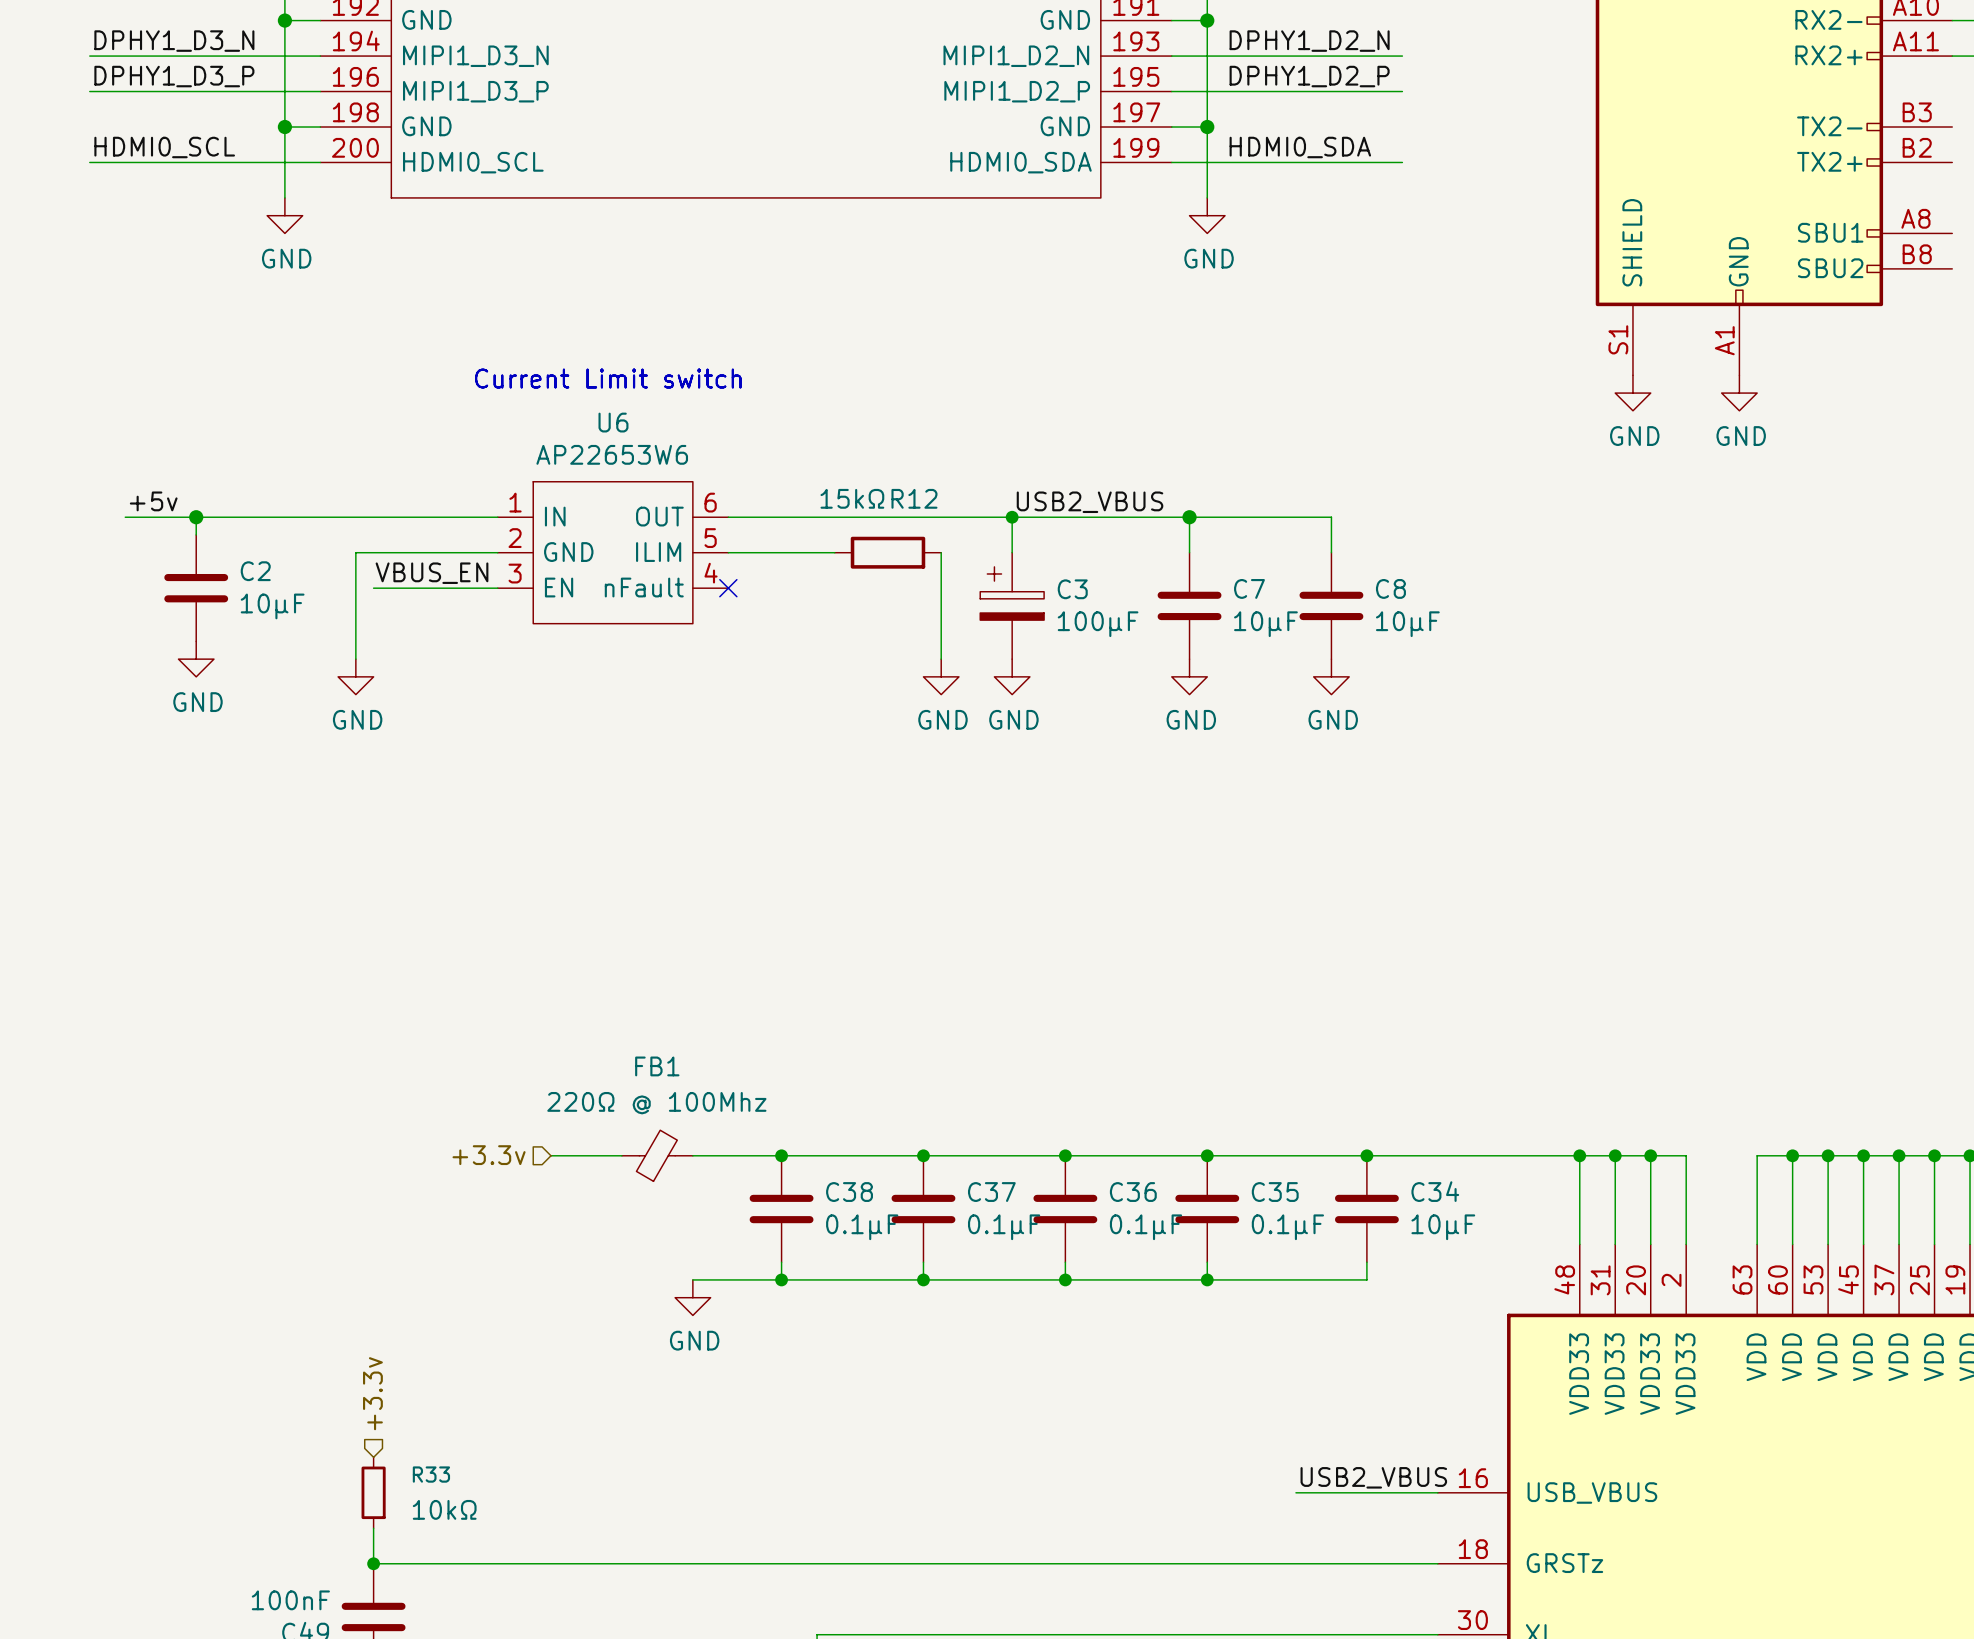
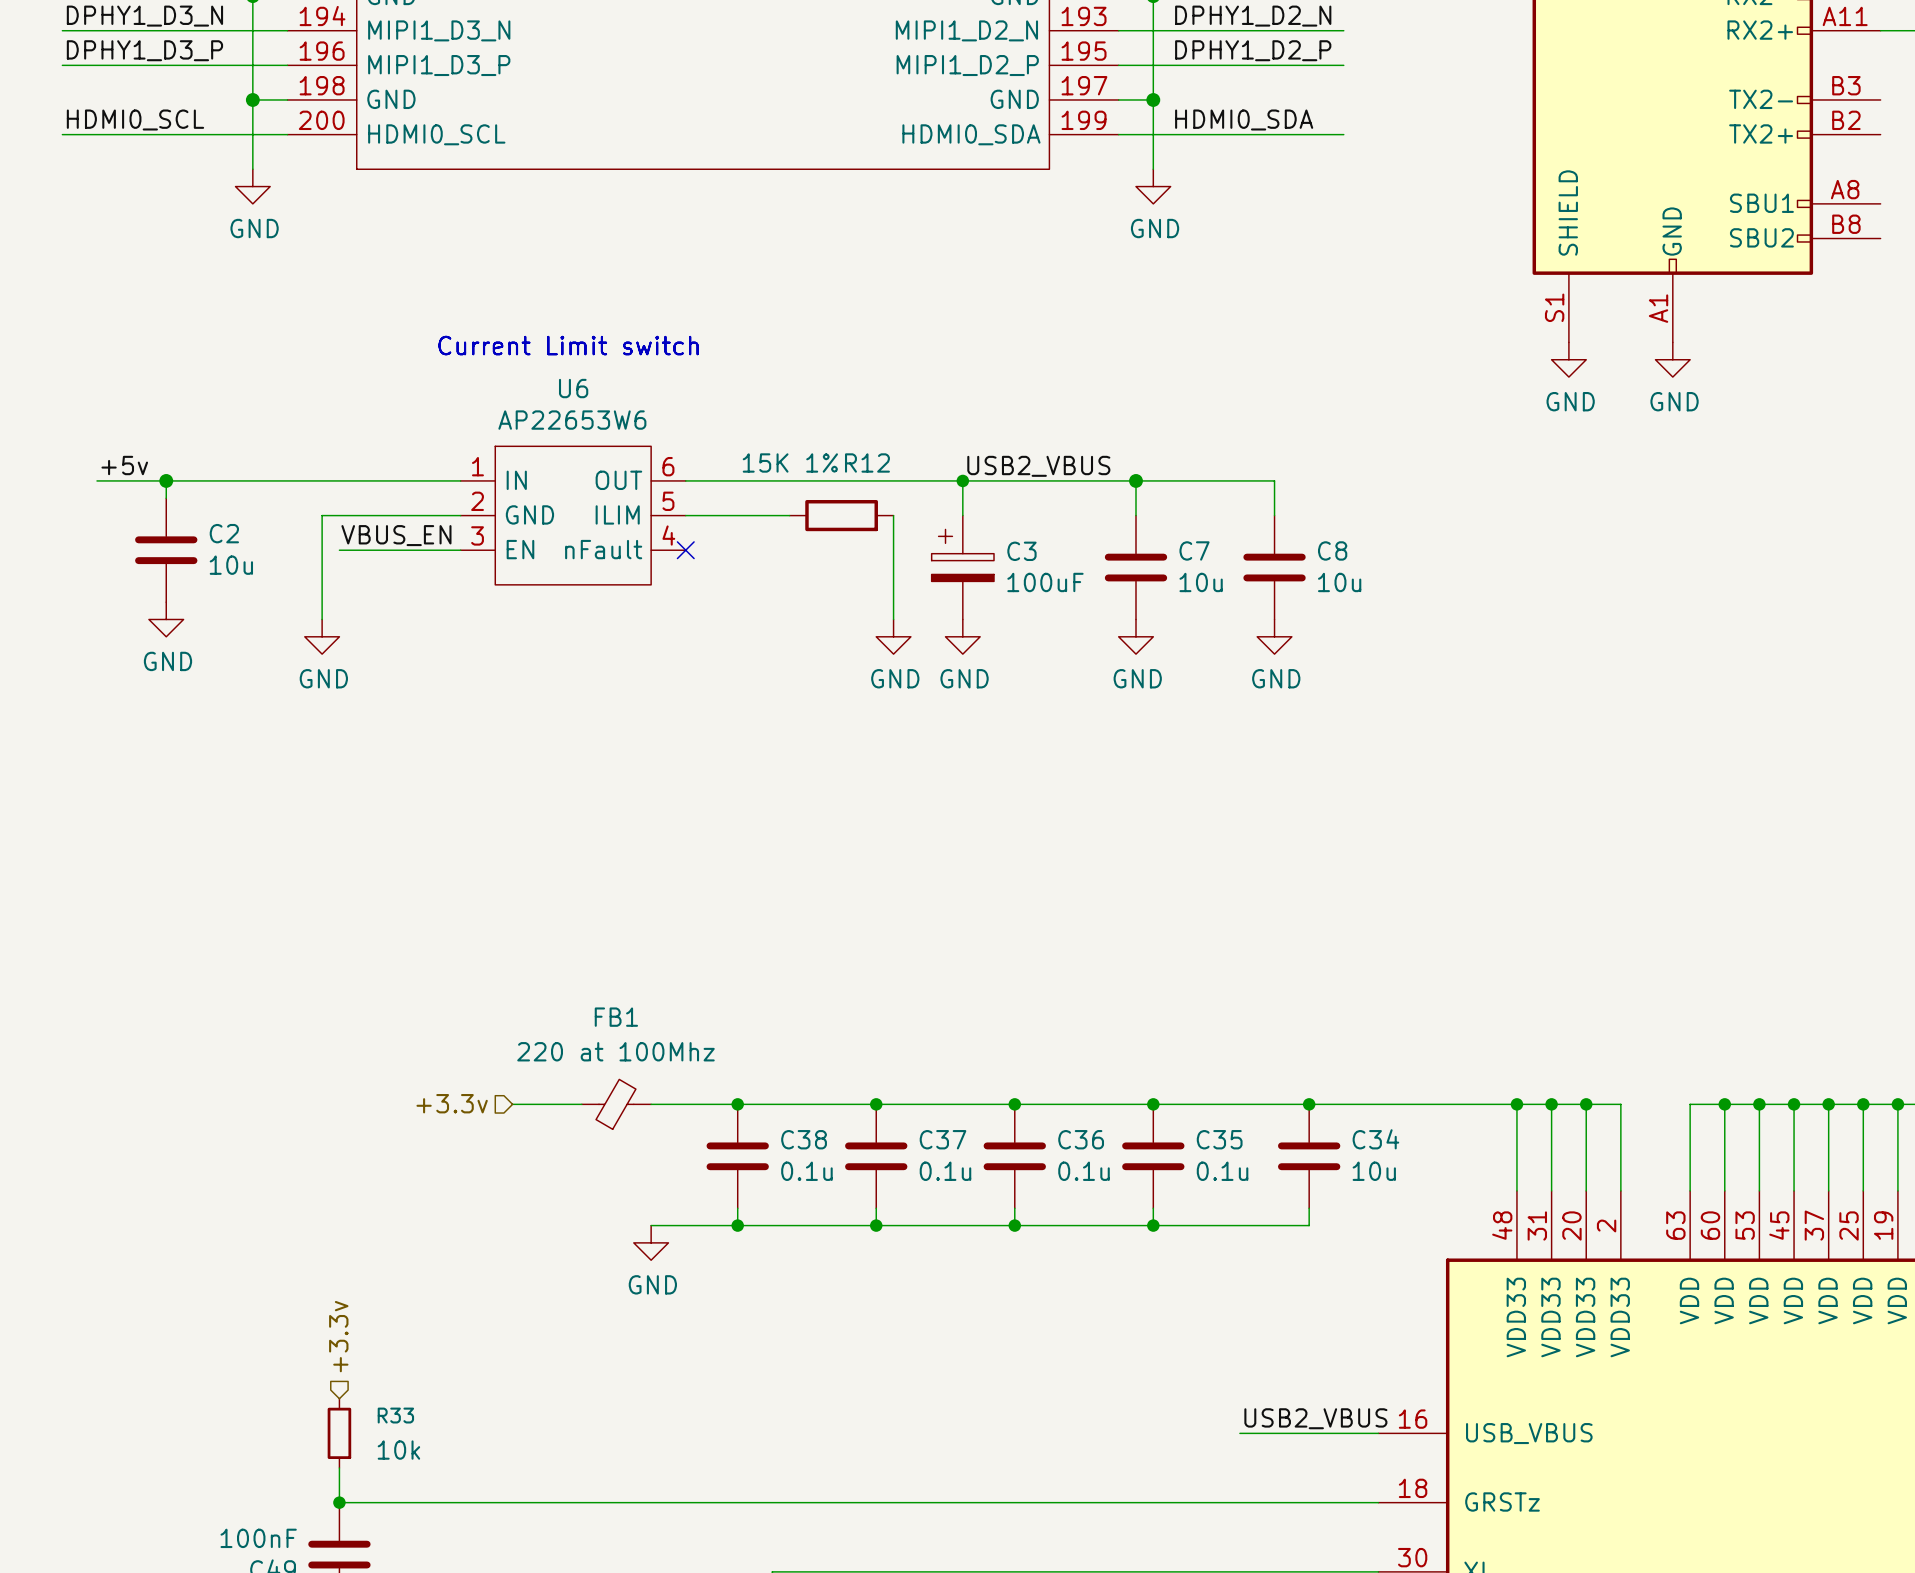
R12 value: 15kΩ (852, 498) -> 15K 1% (790, 462)
C2 value: 10µF (272, 606) -> 10u (231, 565)
C3 value: 100µF (1098, 624) -> 100uF (1045, 582)
C7 value: 10µF (1265, 624) -> 10u (1201, 582)
C8 value: 10µF (1407, 624) -> 10u (1339, 582)
FB1 value: 220Ω @ 100Mhz (656, 1103) -> 220 at 100Mhz (615, 1051)
C38 value: 0.1µF (862, 1227) -> 0.1u (806, 1171)
C37 value: 0.1µF (1004, 1227) -> 0.1u (945, 1171)
C36 value: 0.1µF (1146, 1227) -> 0.1u (1084, 1171)
C35 value: 0.1µF (1287, 1227) -> 0.1u (1222, 1171)
C34 value: 10µF (1443, 1227) -> 10u (1374, 1171)
R33 value: 10kΩ (444, 1509) -> 10k (398, 1450)

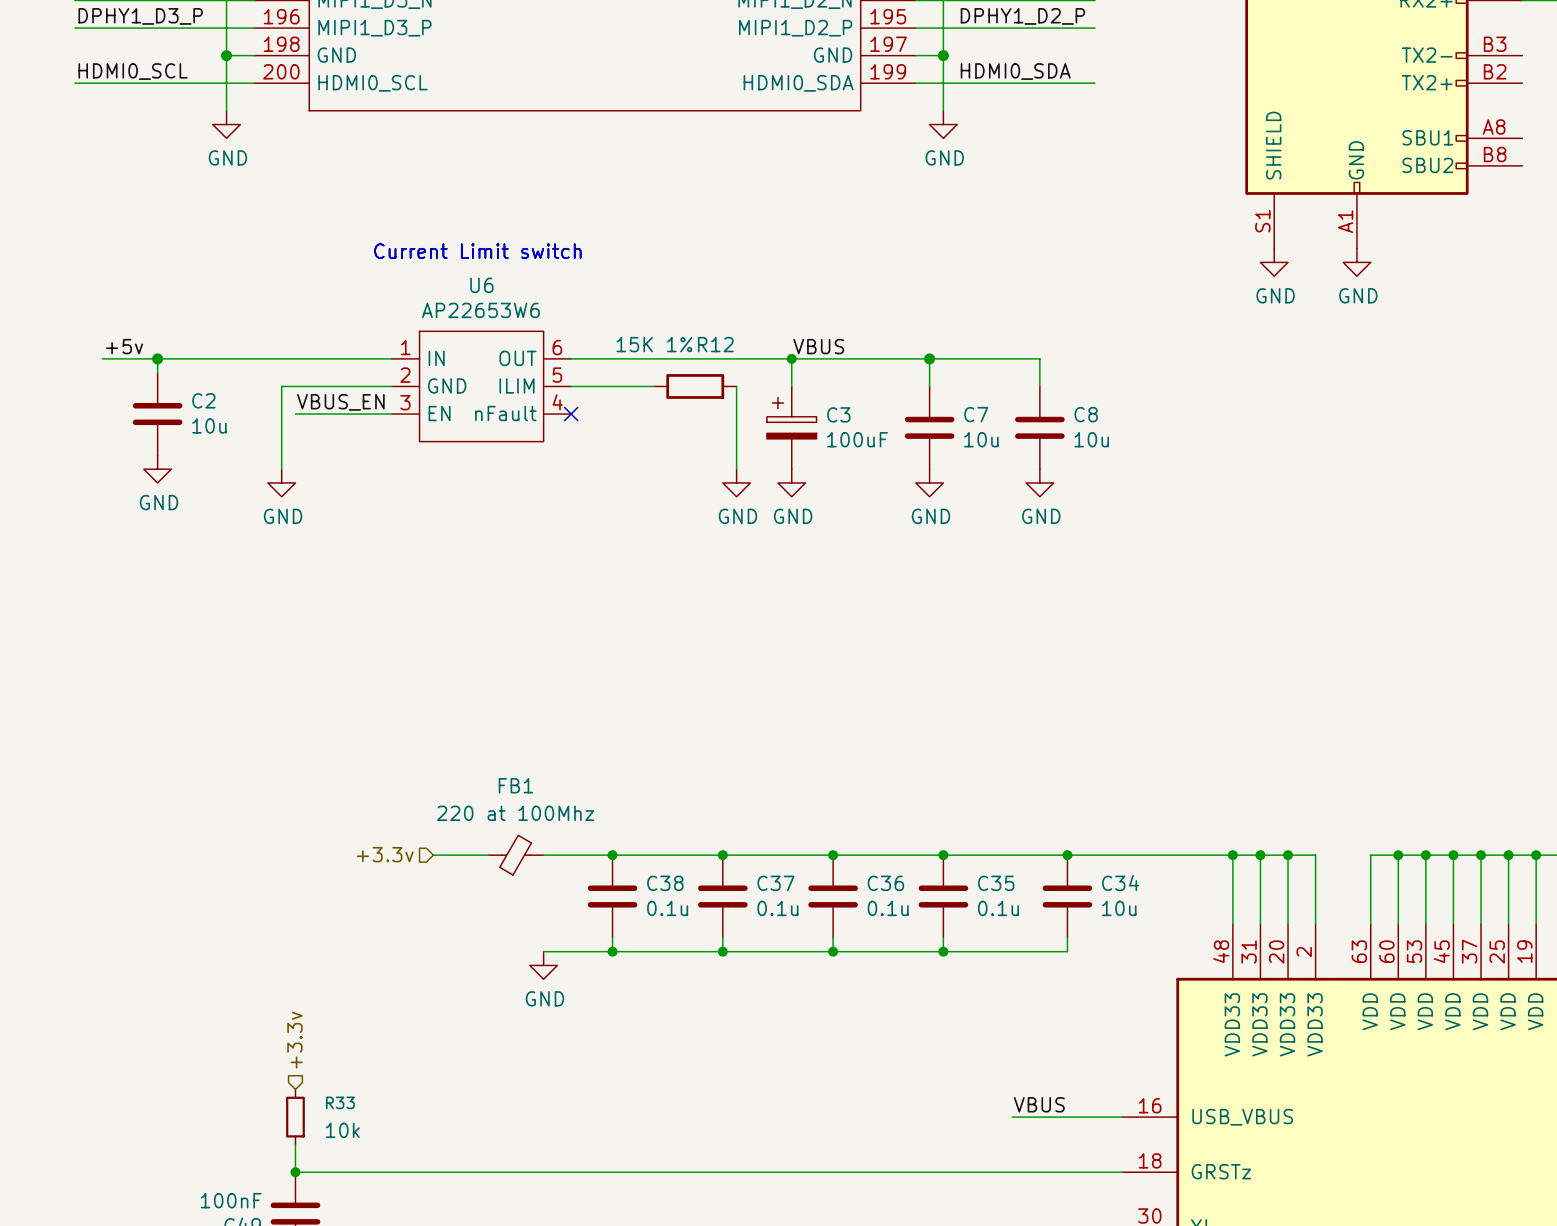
label: USB2_VBUS (1038, 466) -> VBUS (818, 346)
label: USB2_VBUS (1315, 1418) -> VBUS (1039, 1104)

